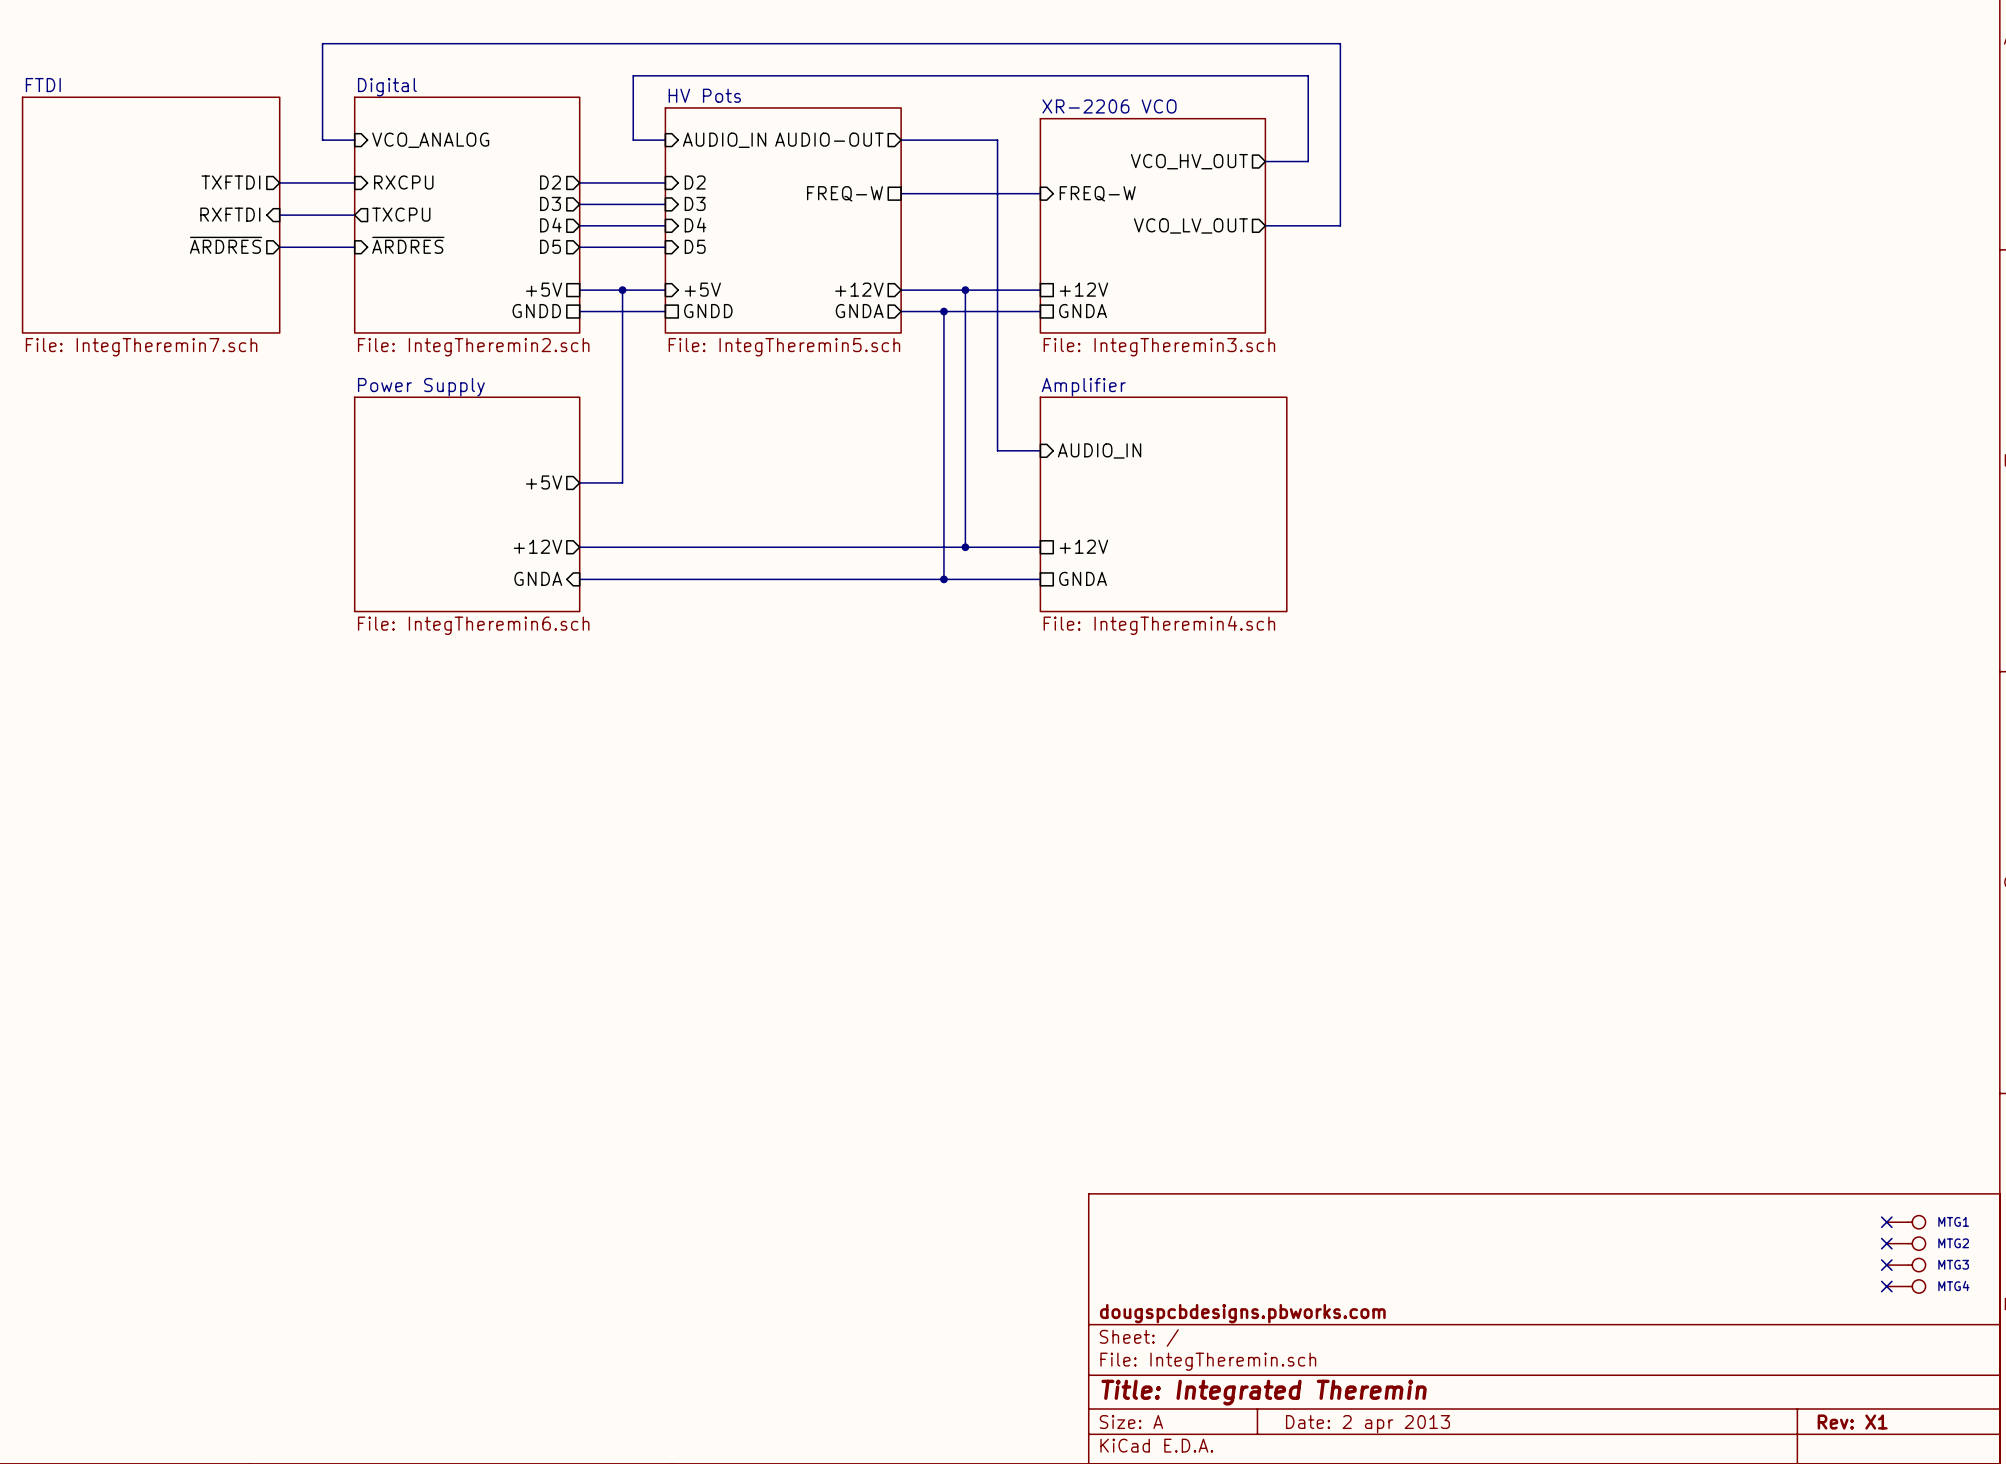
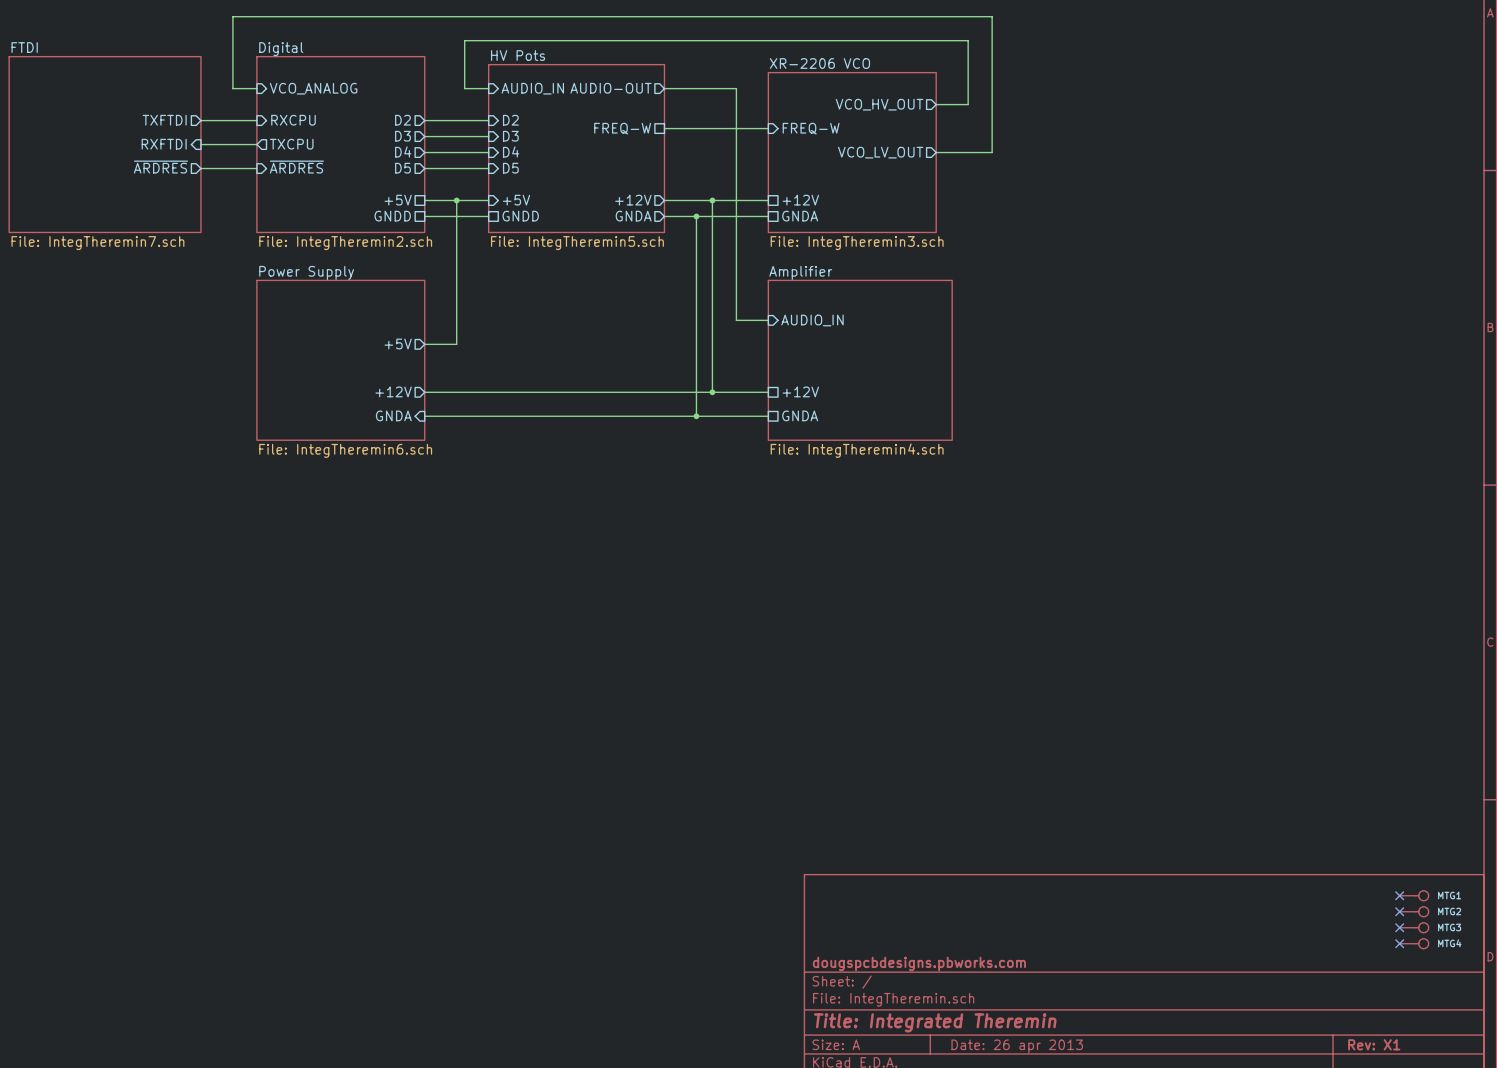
title block: Date: 2 apr 2013 (1367, 1424) -> Date: 26 apr 2013 (1017, 1046)

